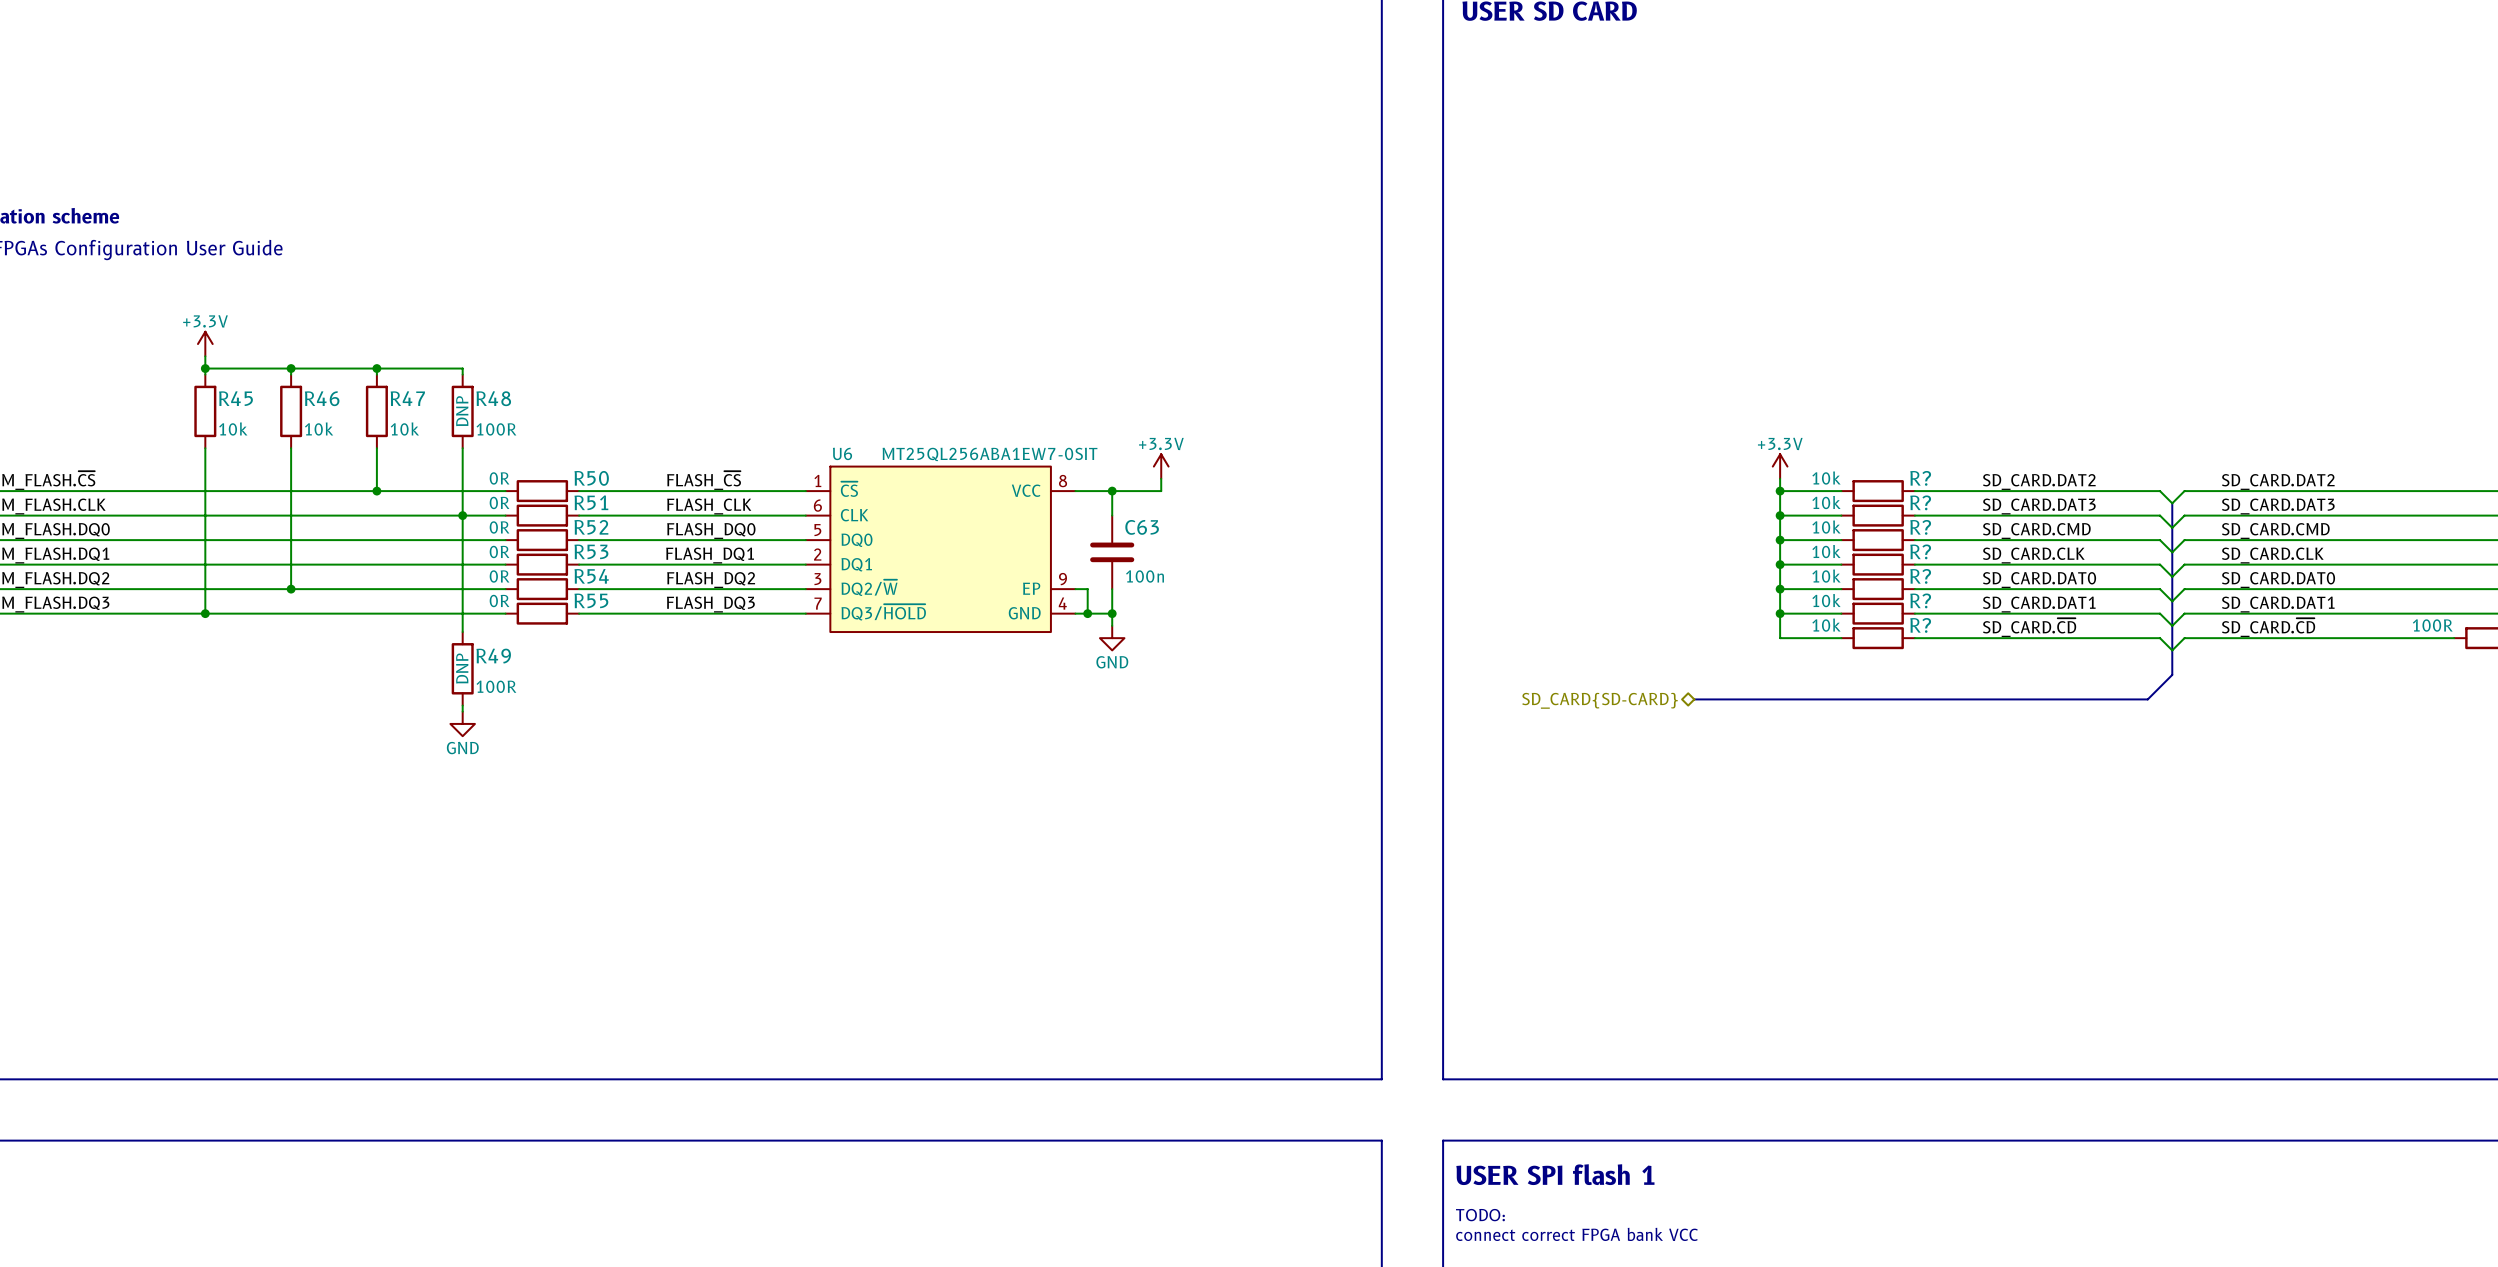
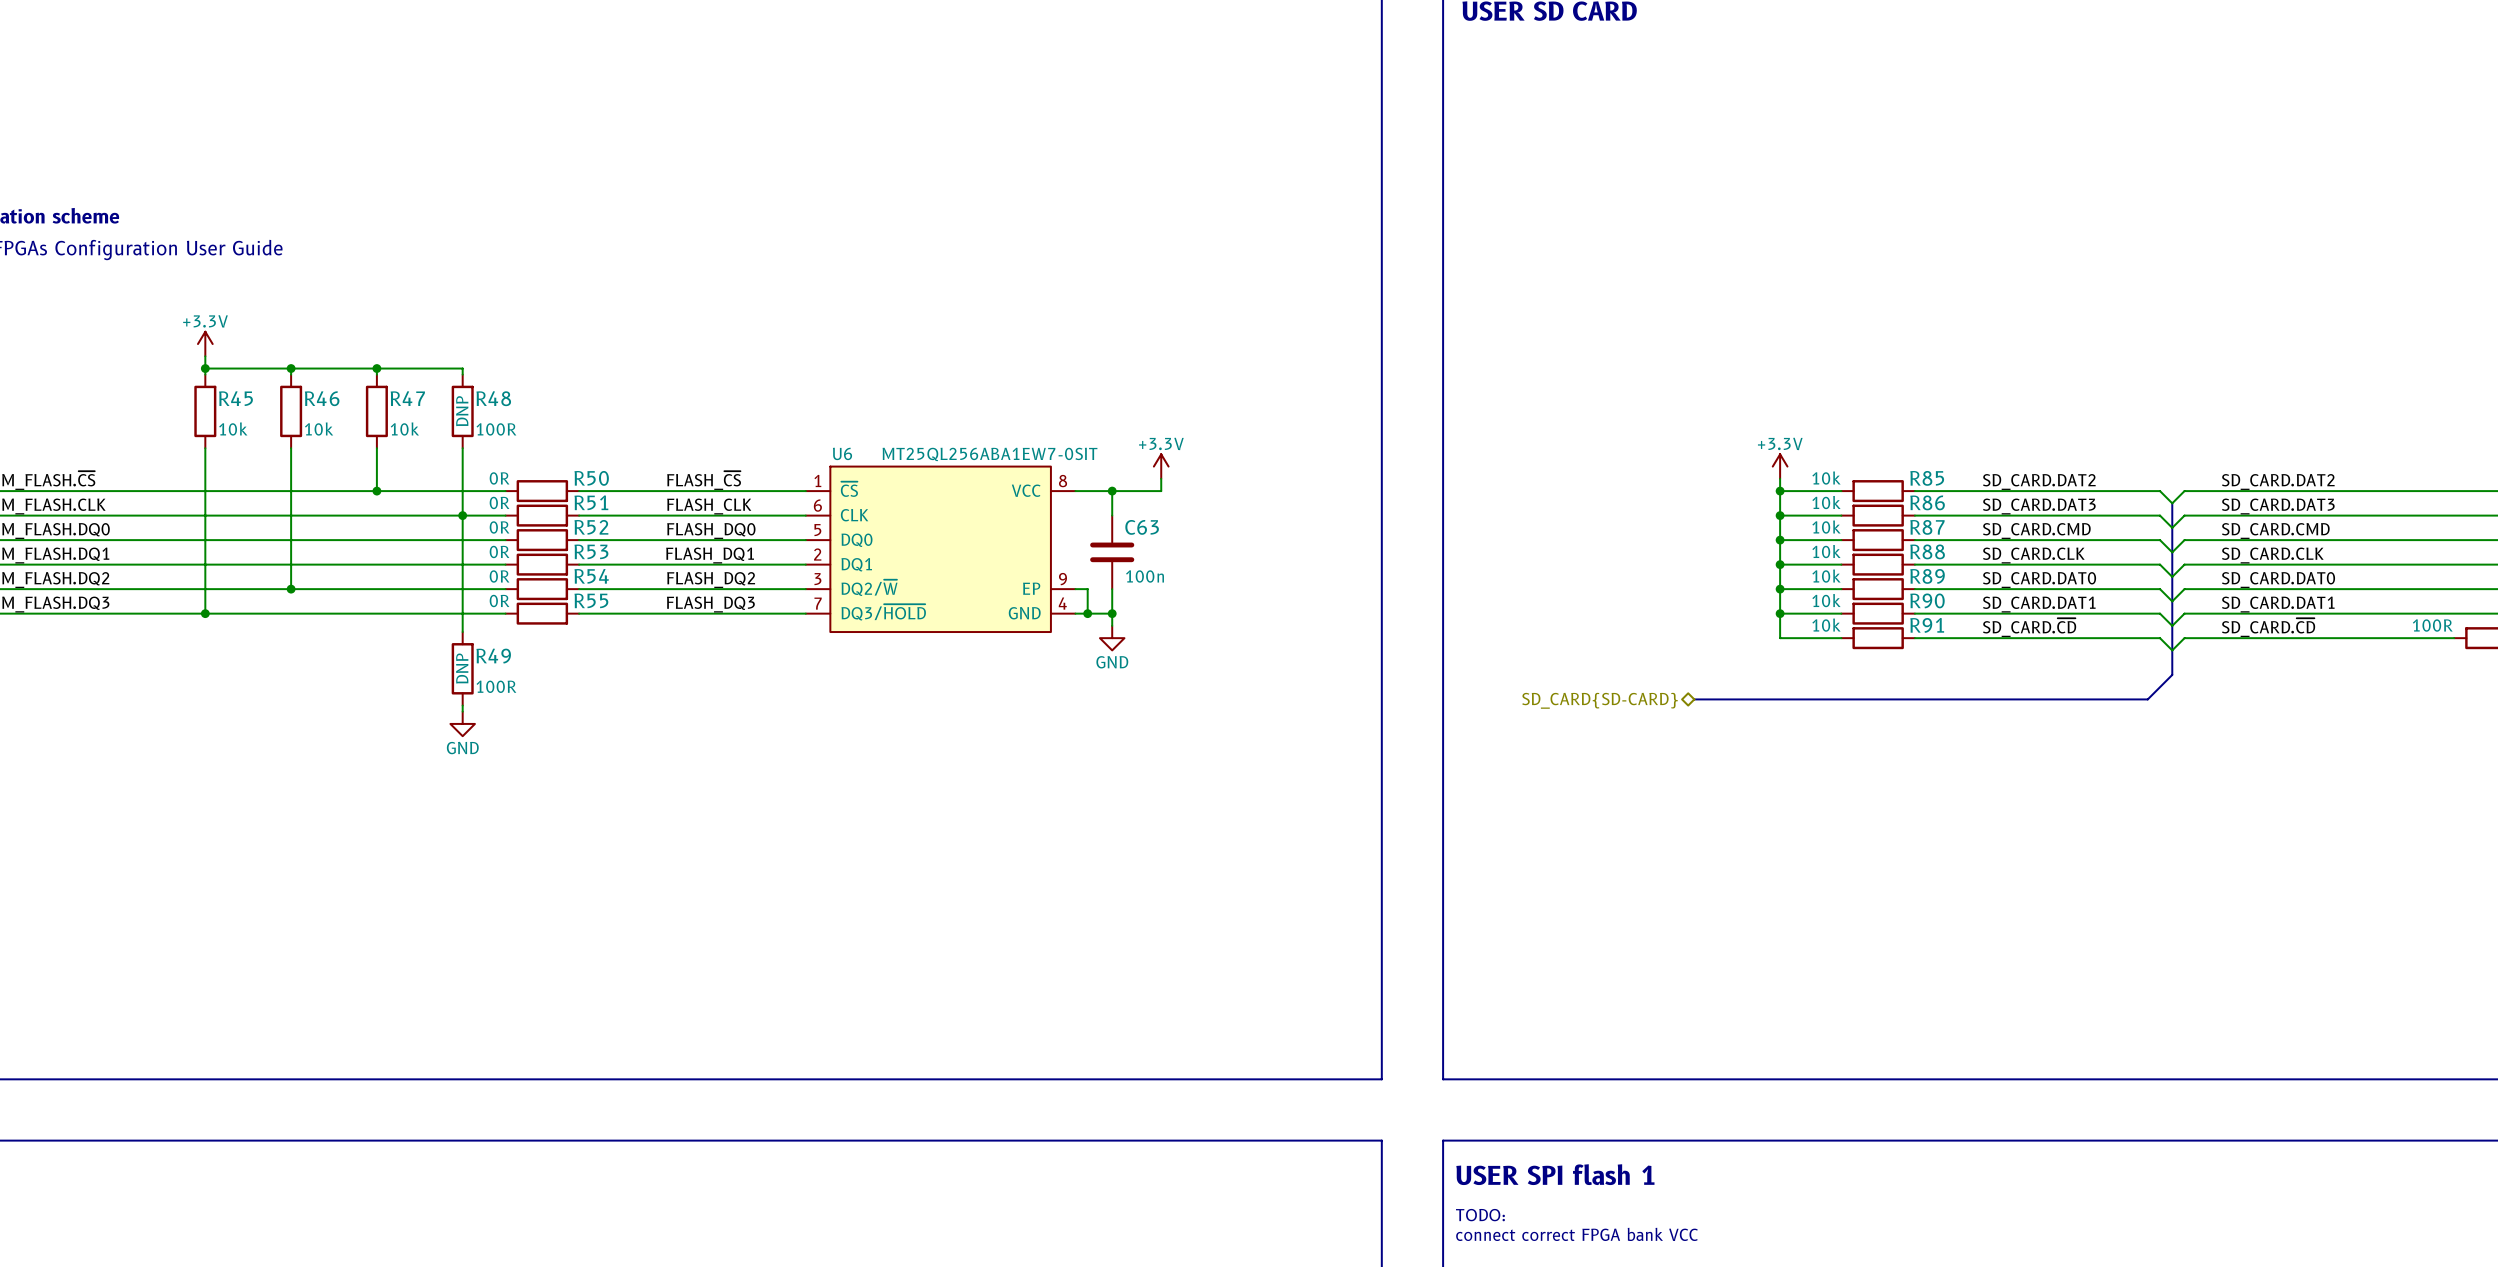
R? name: R? (1920, 478) -> R85 (1927, 478)
R? name: R? (1920, 502) -> R86 (1927, 502)
R? name: R? (1920, 527) -> R87 (1927, 527)
R? name: R? (1920, 551) -> R88 (1927, 551)
R? name: R? (1920, 576) -> R89 (1927, 576)
R? name: R? (1920, 600) -> R90 (1927, 600)
R? name: R? (1920, 625) -> R91 (1927, 625)

